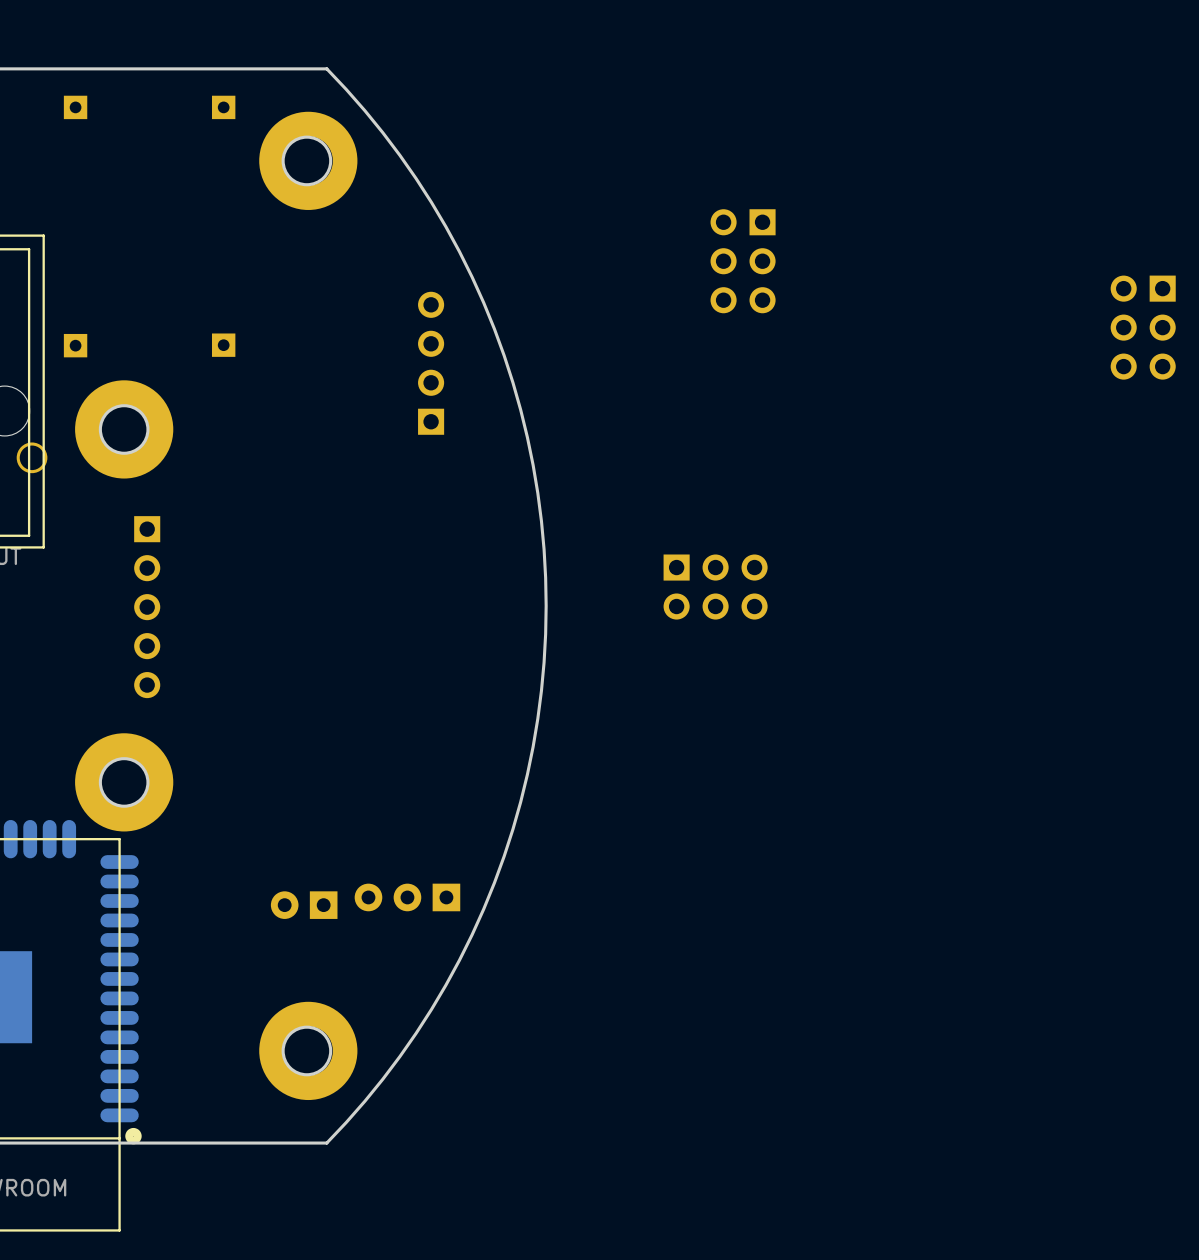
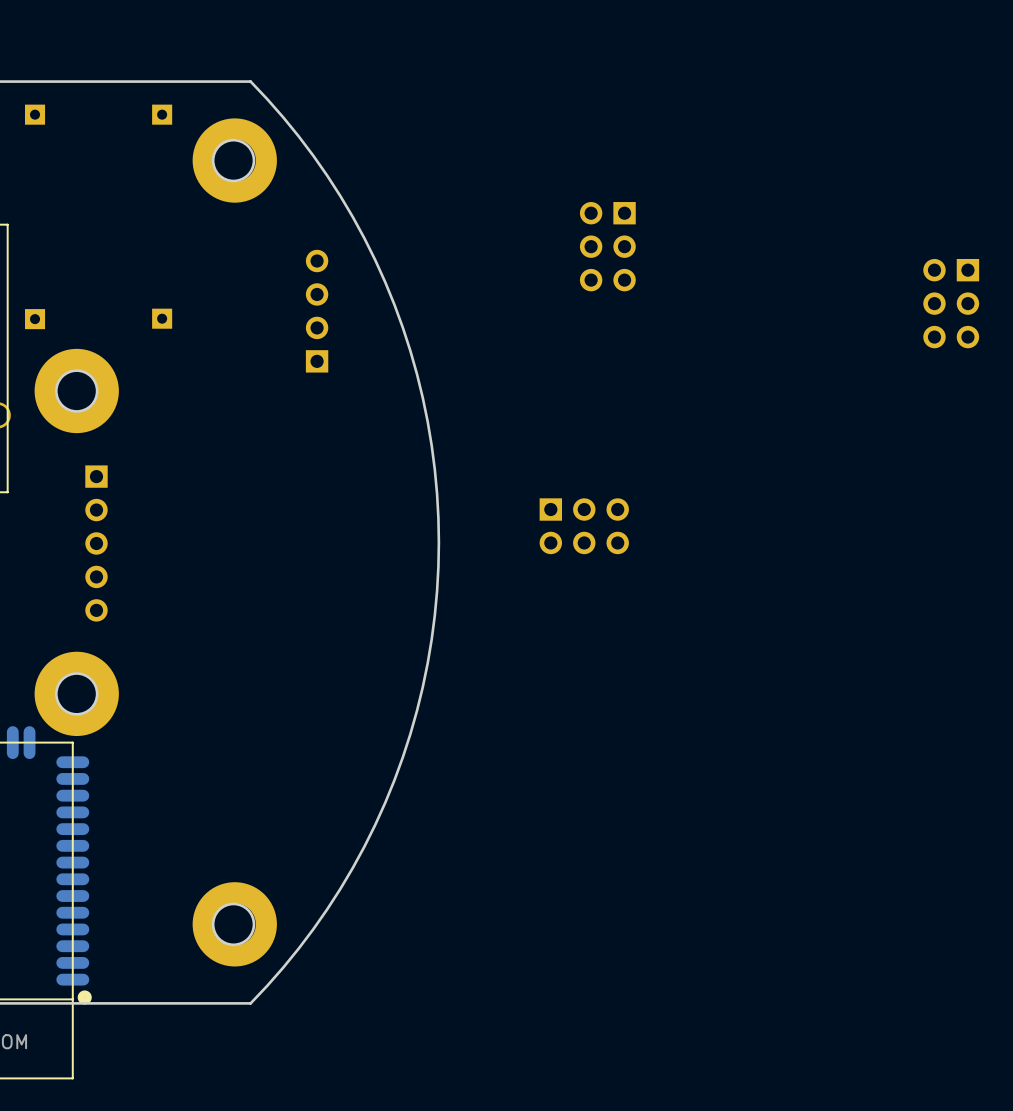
part position: (431, 363) -> (317, 311)
part: (407, 897) -> none
part: (304, 905) -> none

